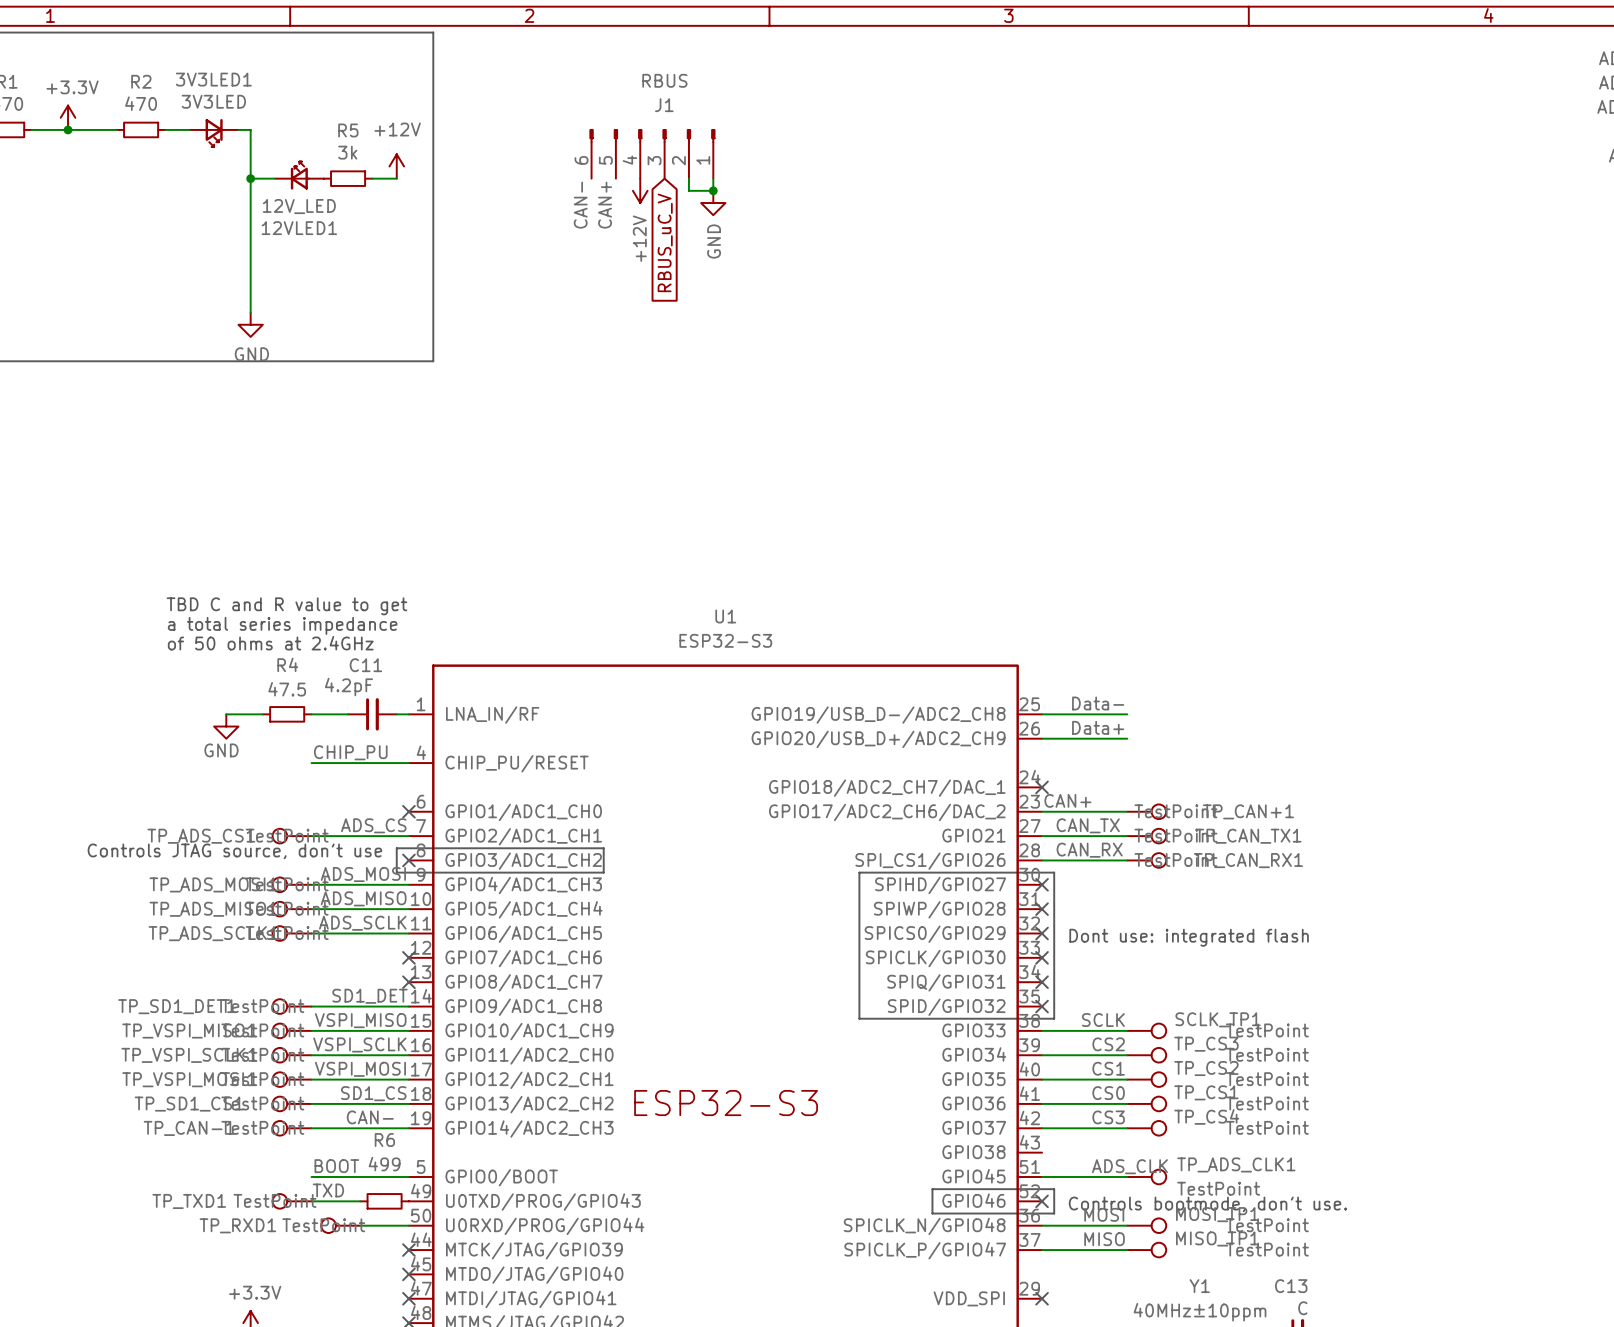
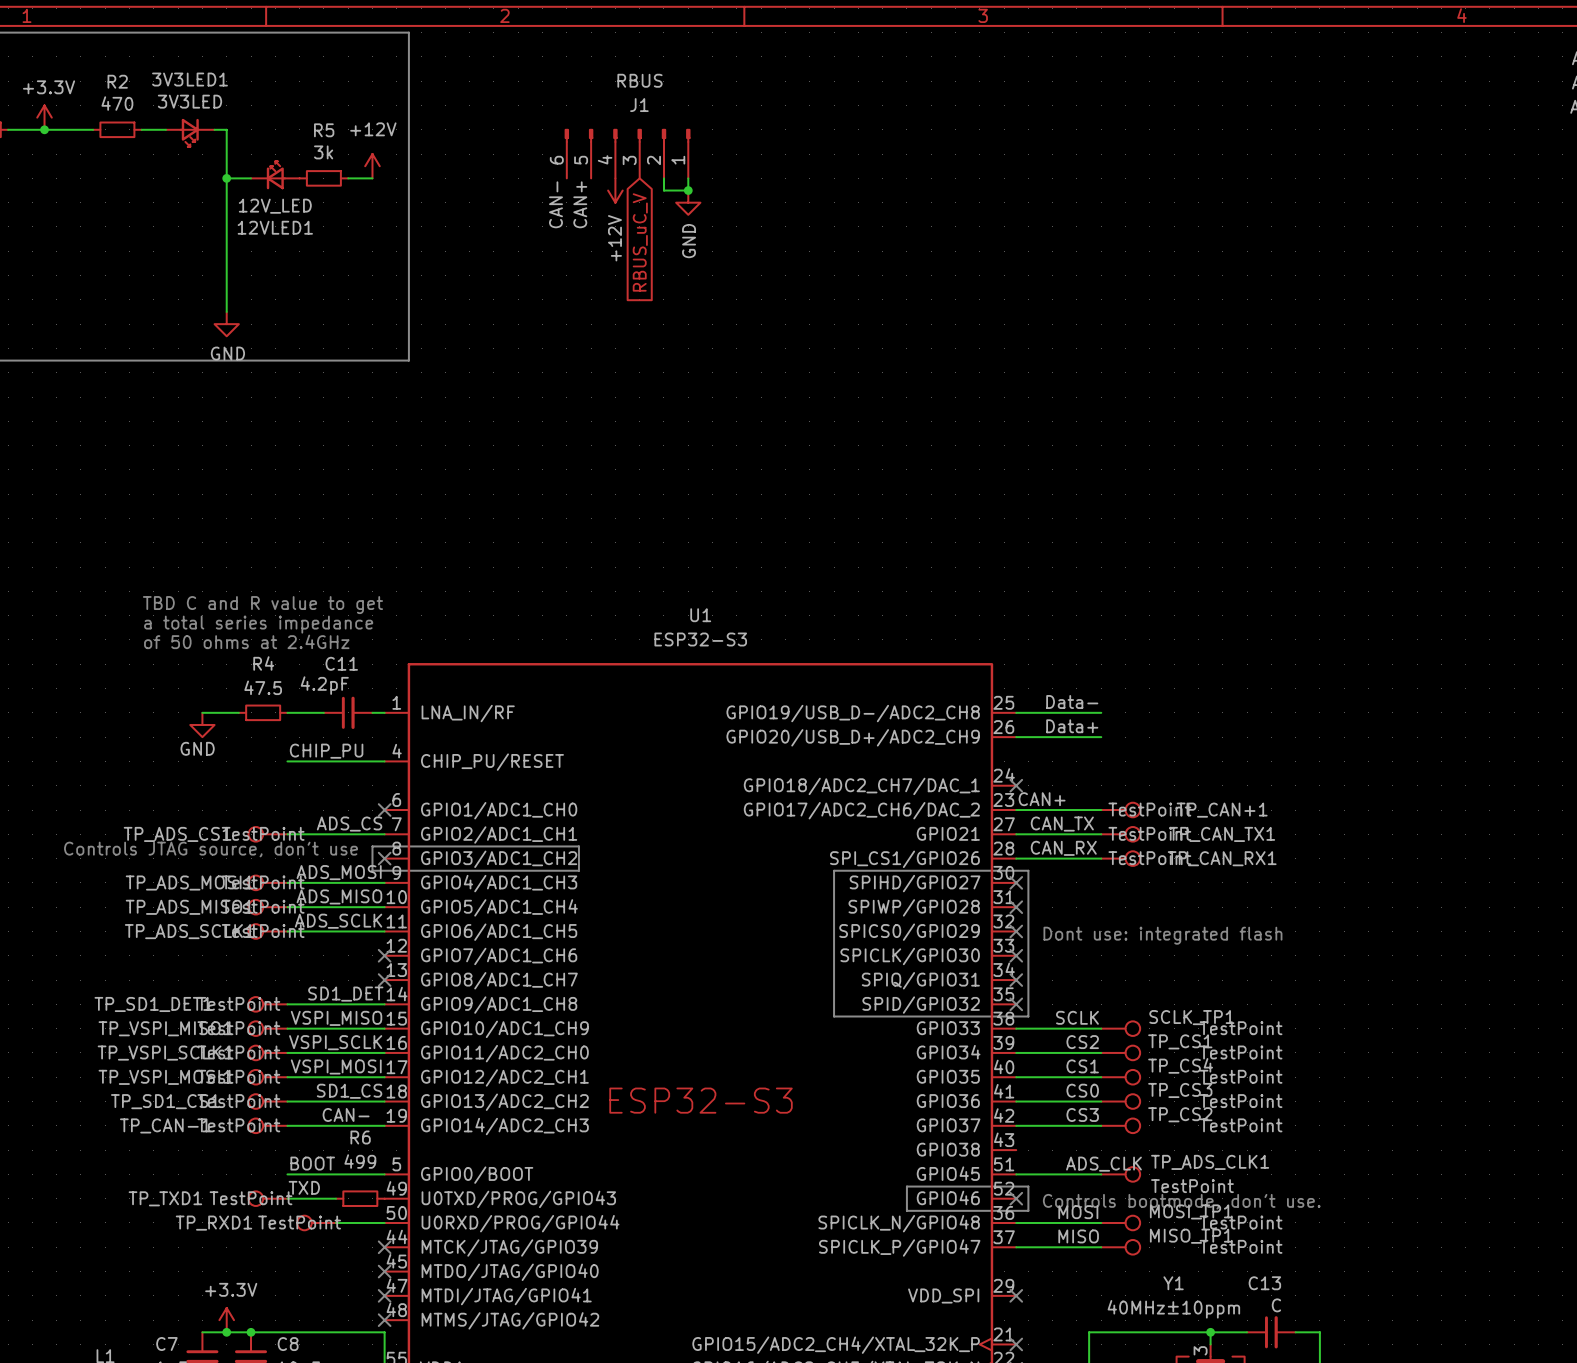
TP_CS3 name: TP_CS3 (1206, 1044) -> TP_CS1 (1180, 1041)
TP_CS2 name: TP_CS2 (1206, 1068) -> TP_CS4 (1180, 1065)
TP_CS1 name: TP_CS1 (1206, 1092) -> TP_CS3 (1180, 1090)
TP_CS4 name: TP_CS4 (1206, 1116) -> TP_CS2 (1180, 1114)

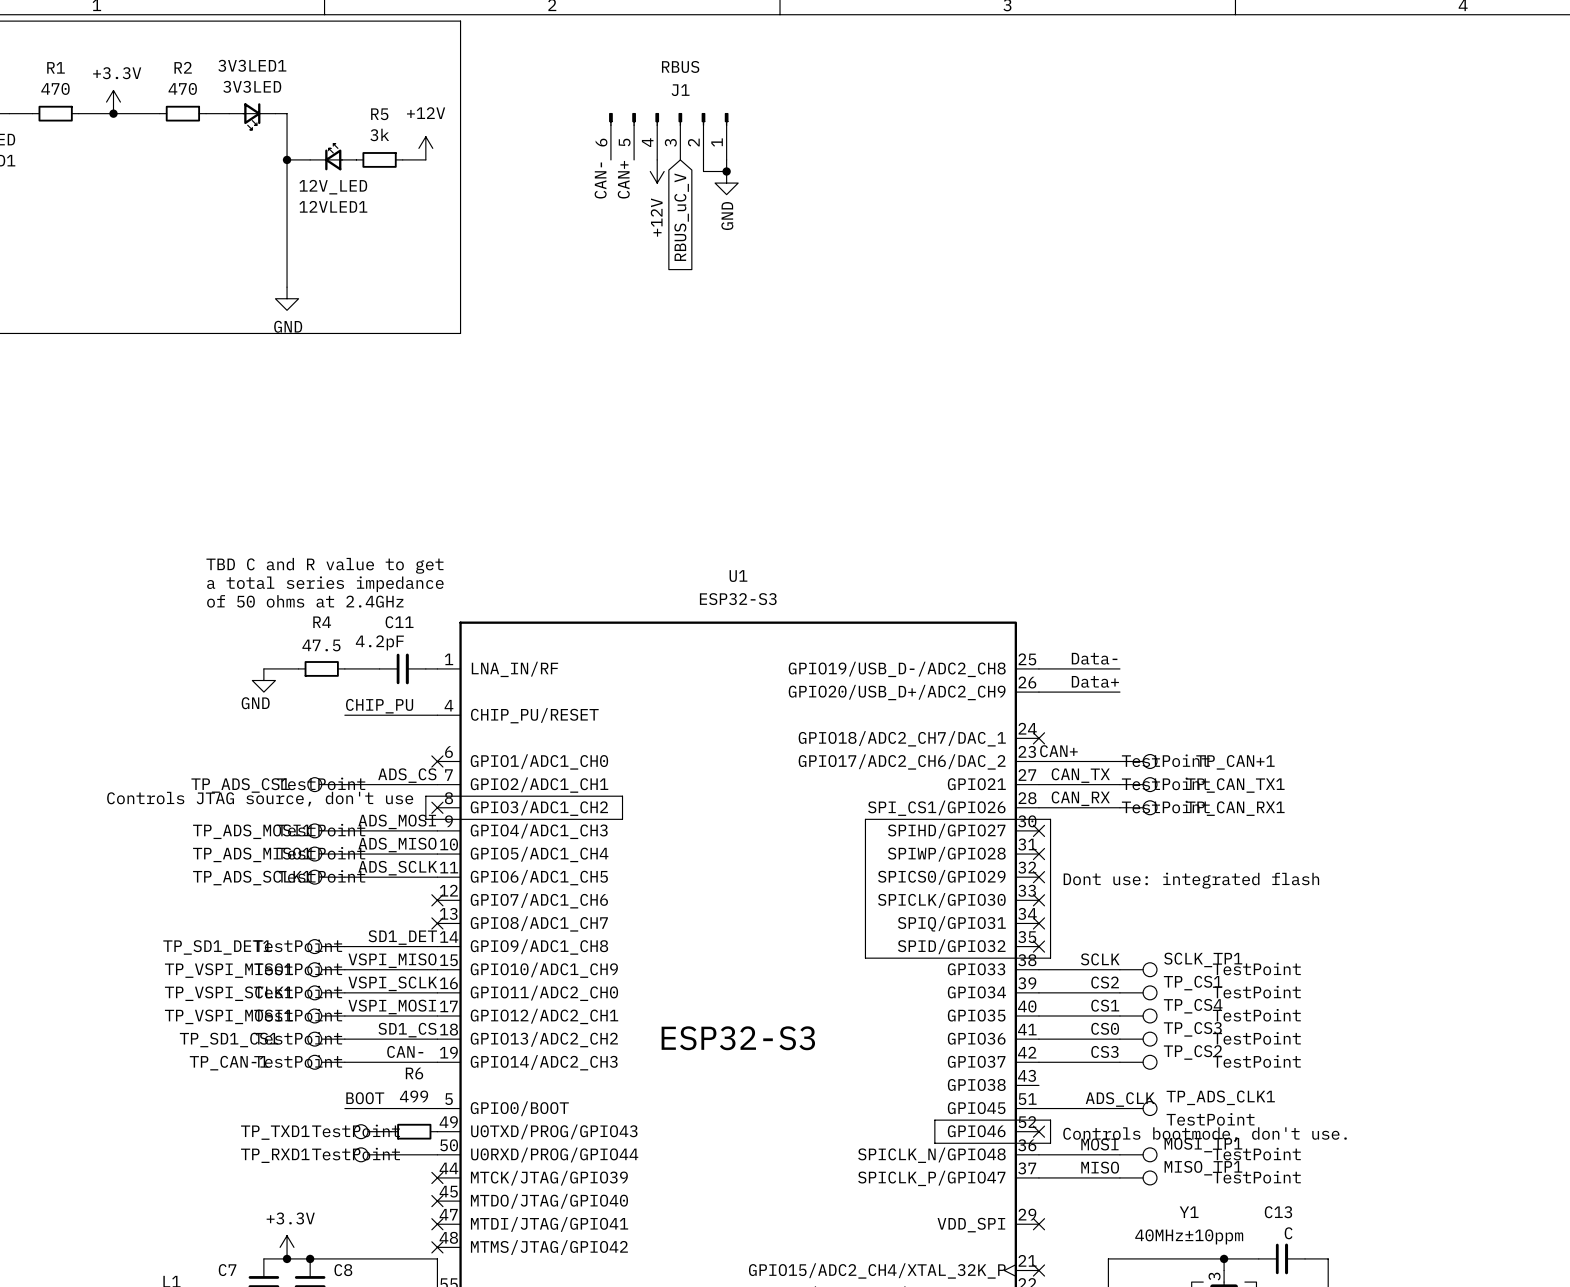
label: TXD (304, 1187) -> none
TP_TXD1 position: (268, 1198) -> (372, 1131)

